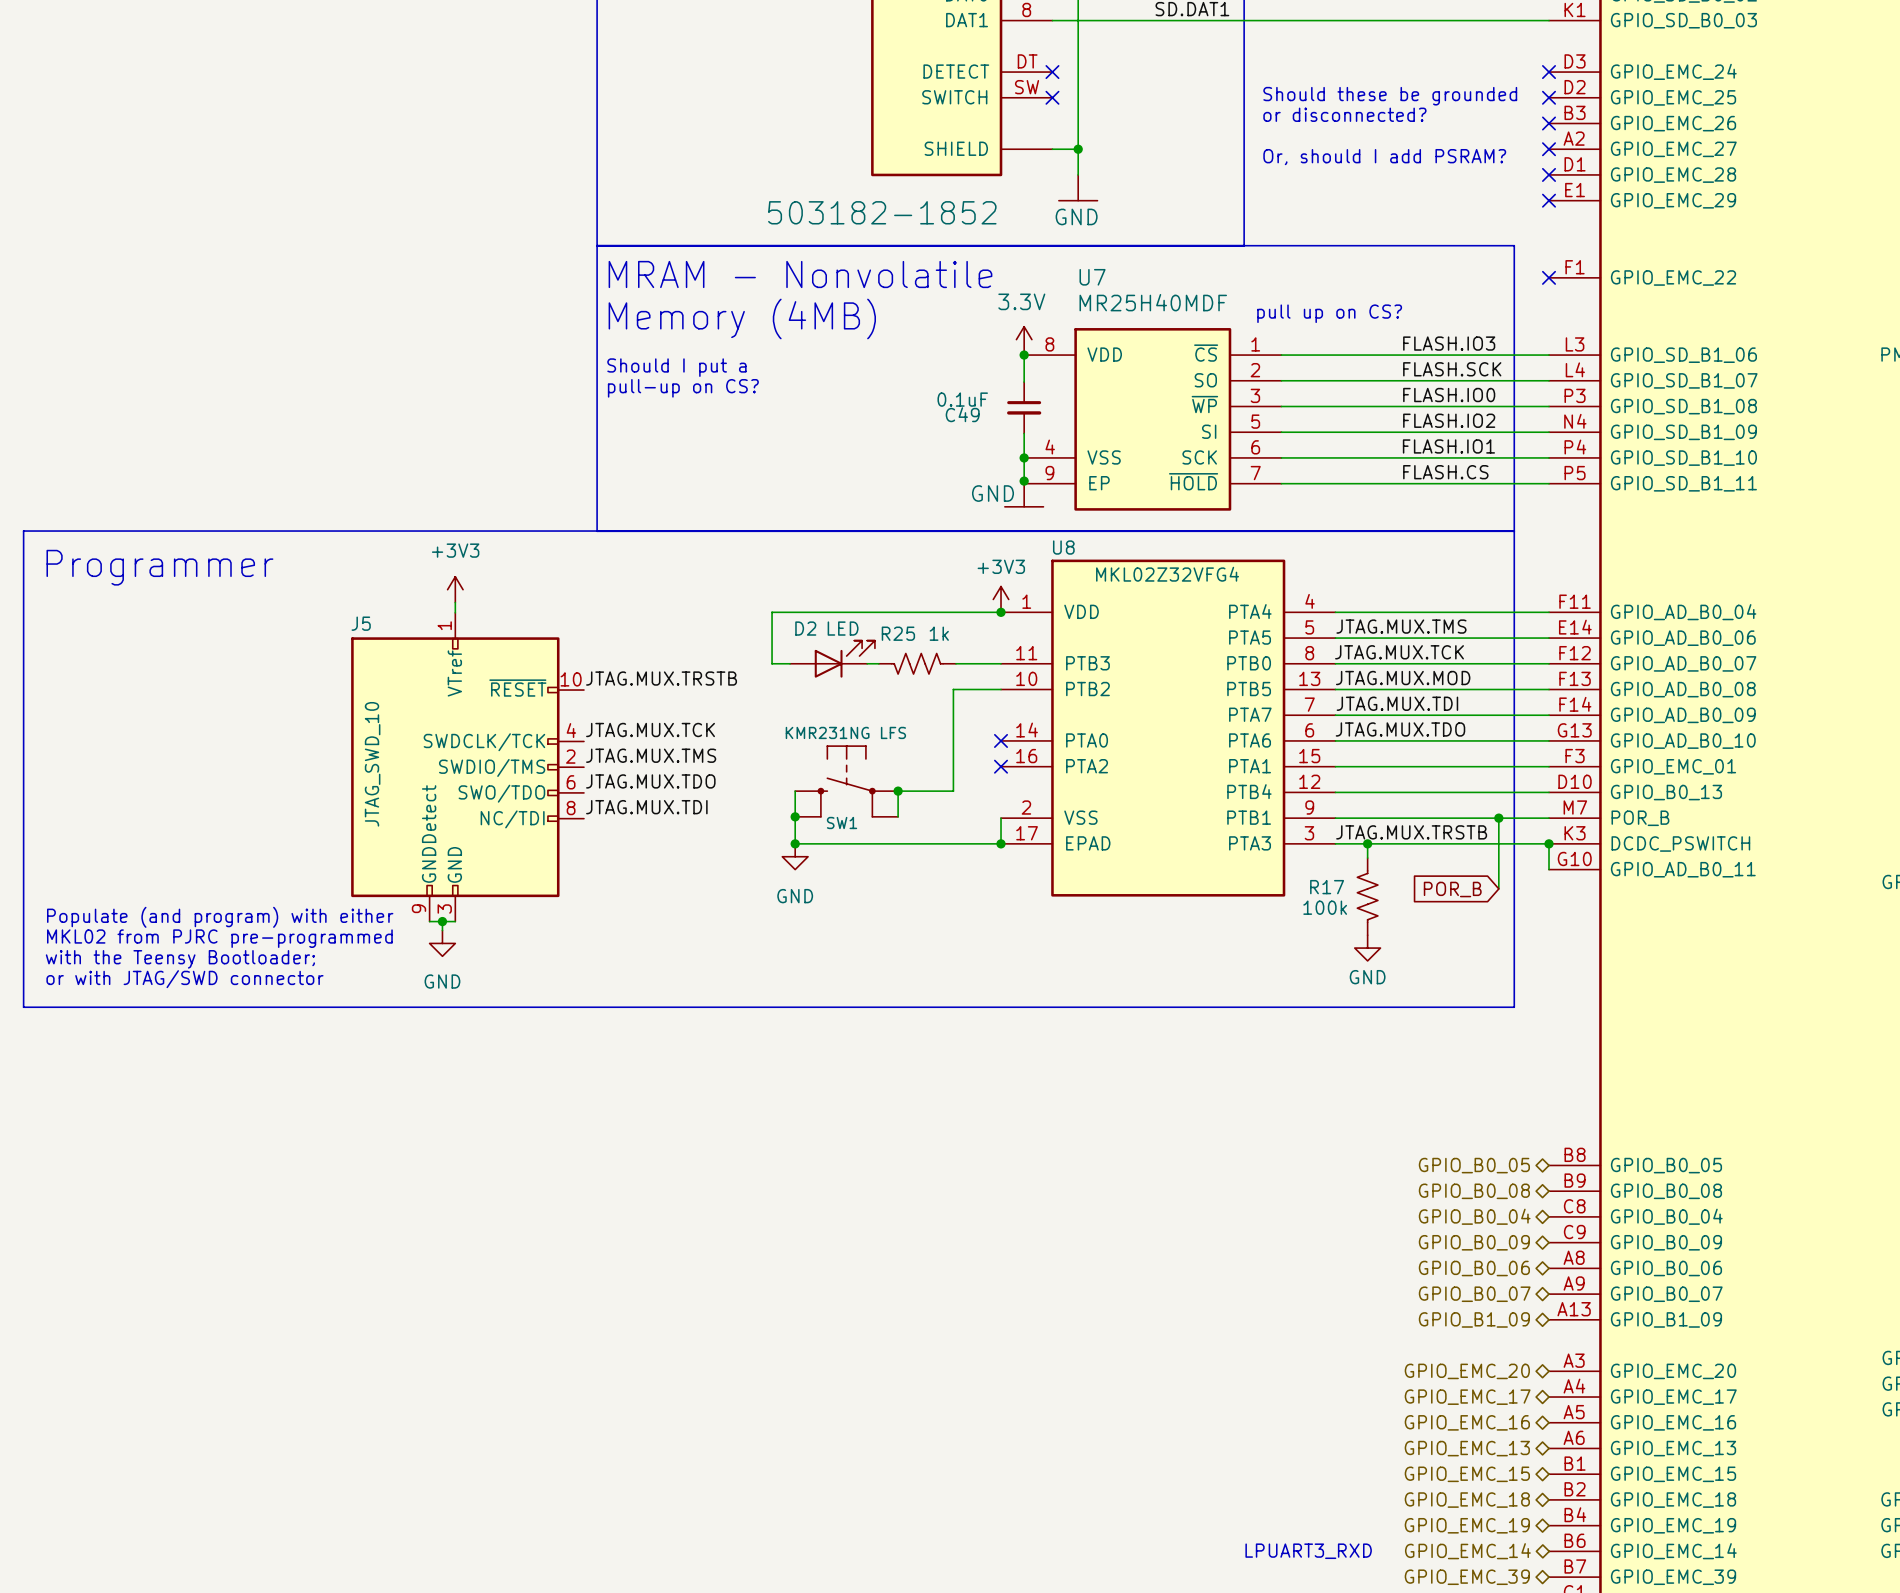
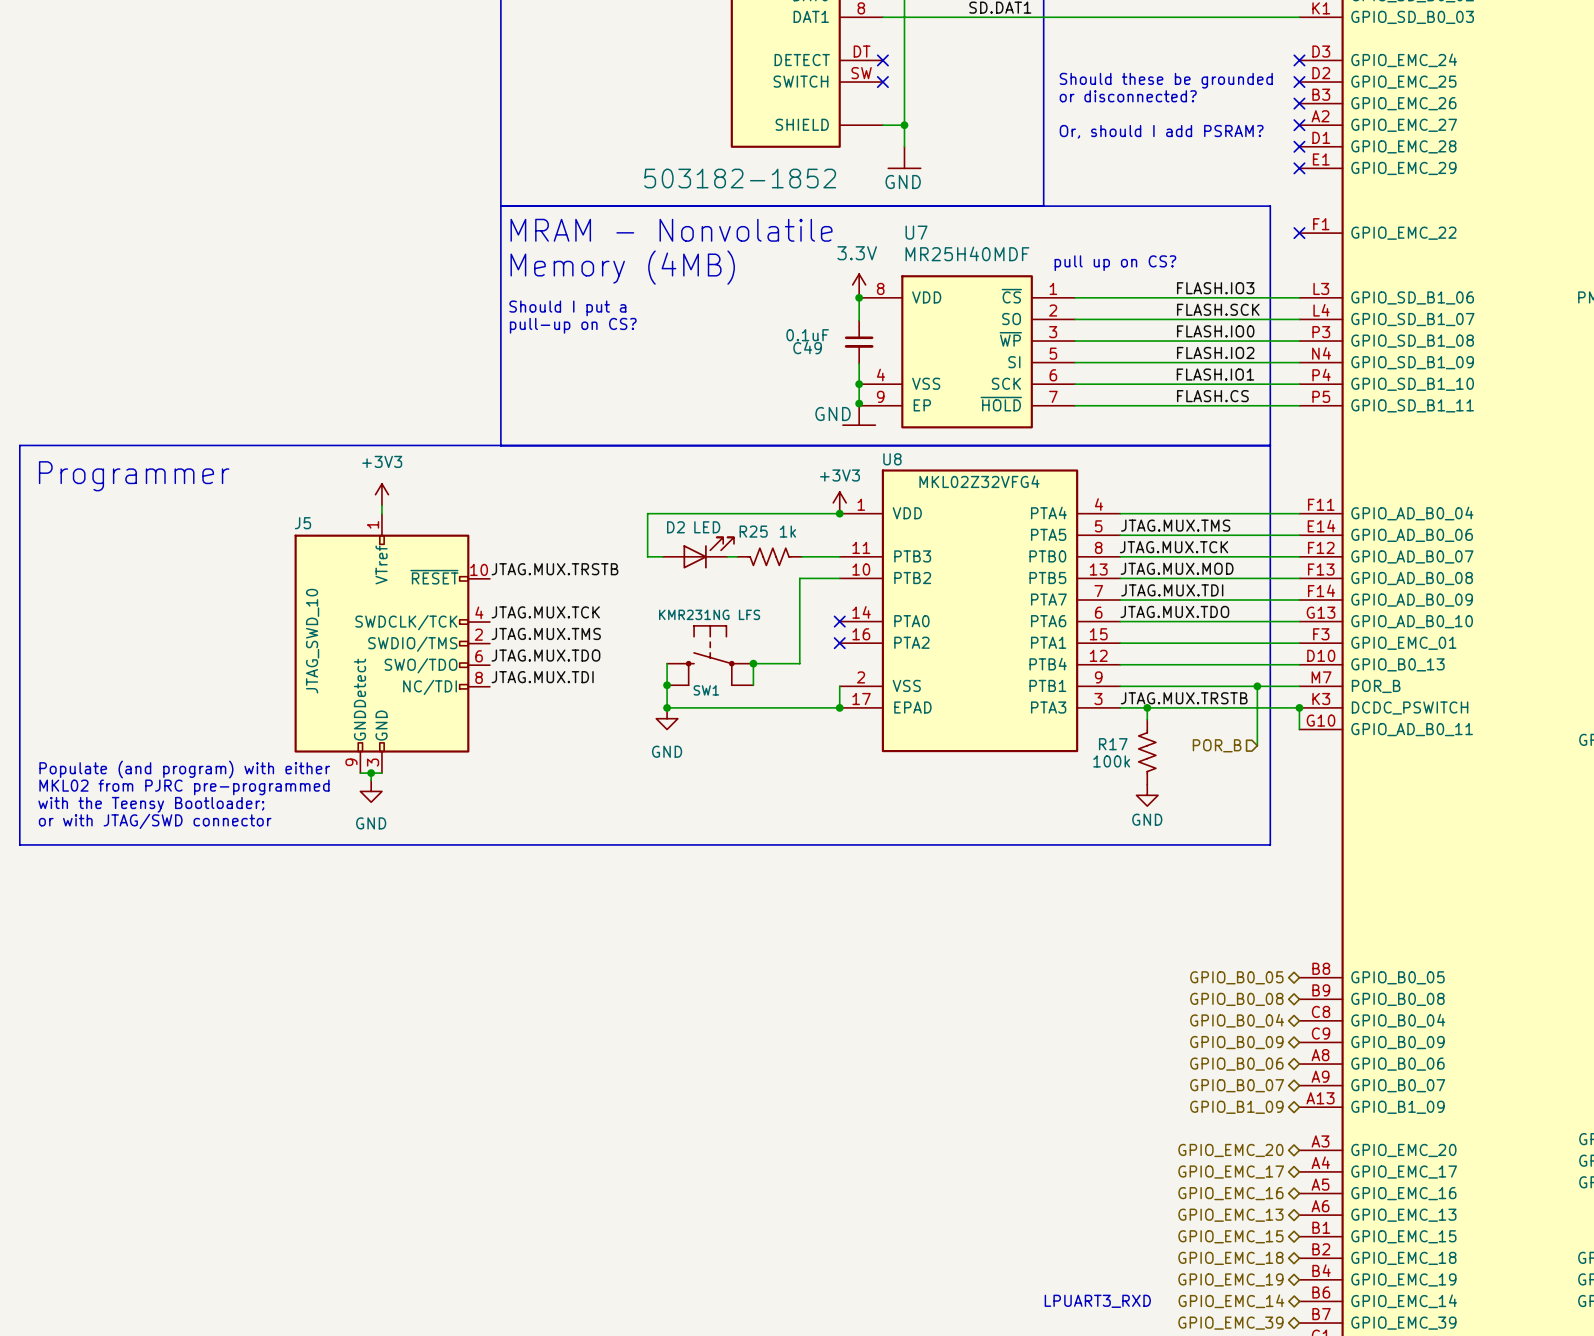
hierarchical label: none -> POR_B (1217, 745)
global label: POR_B (1452, 889) -> none

